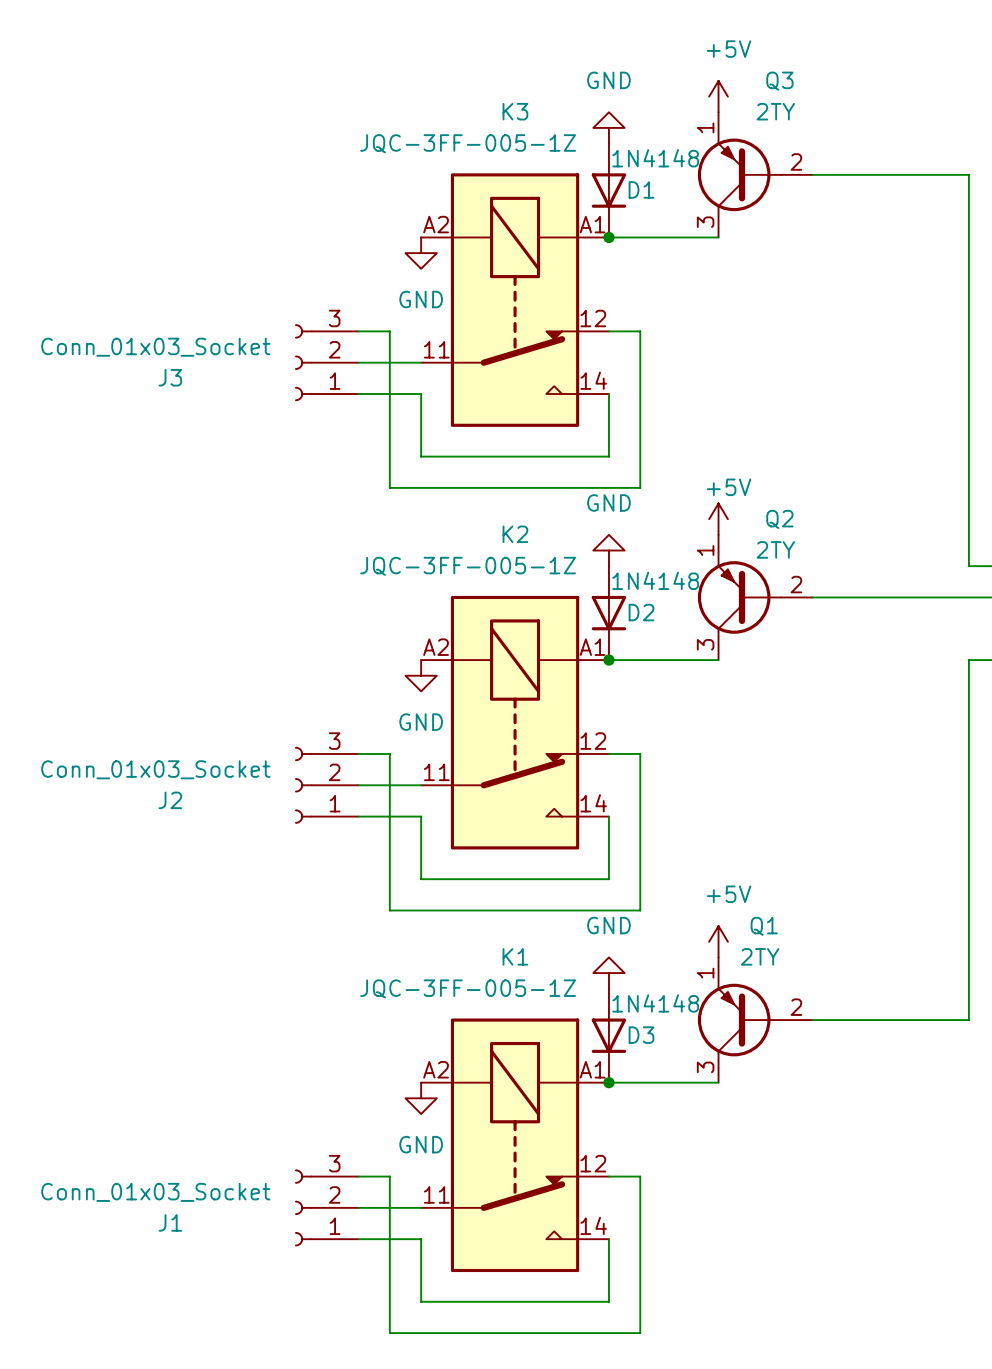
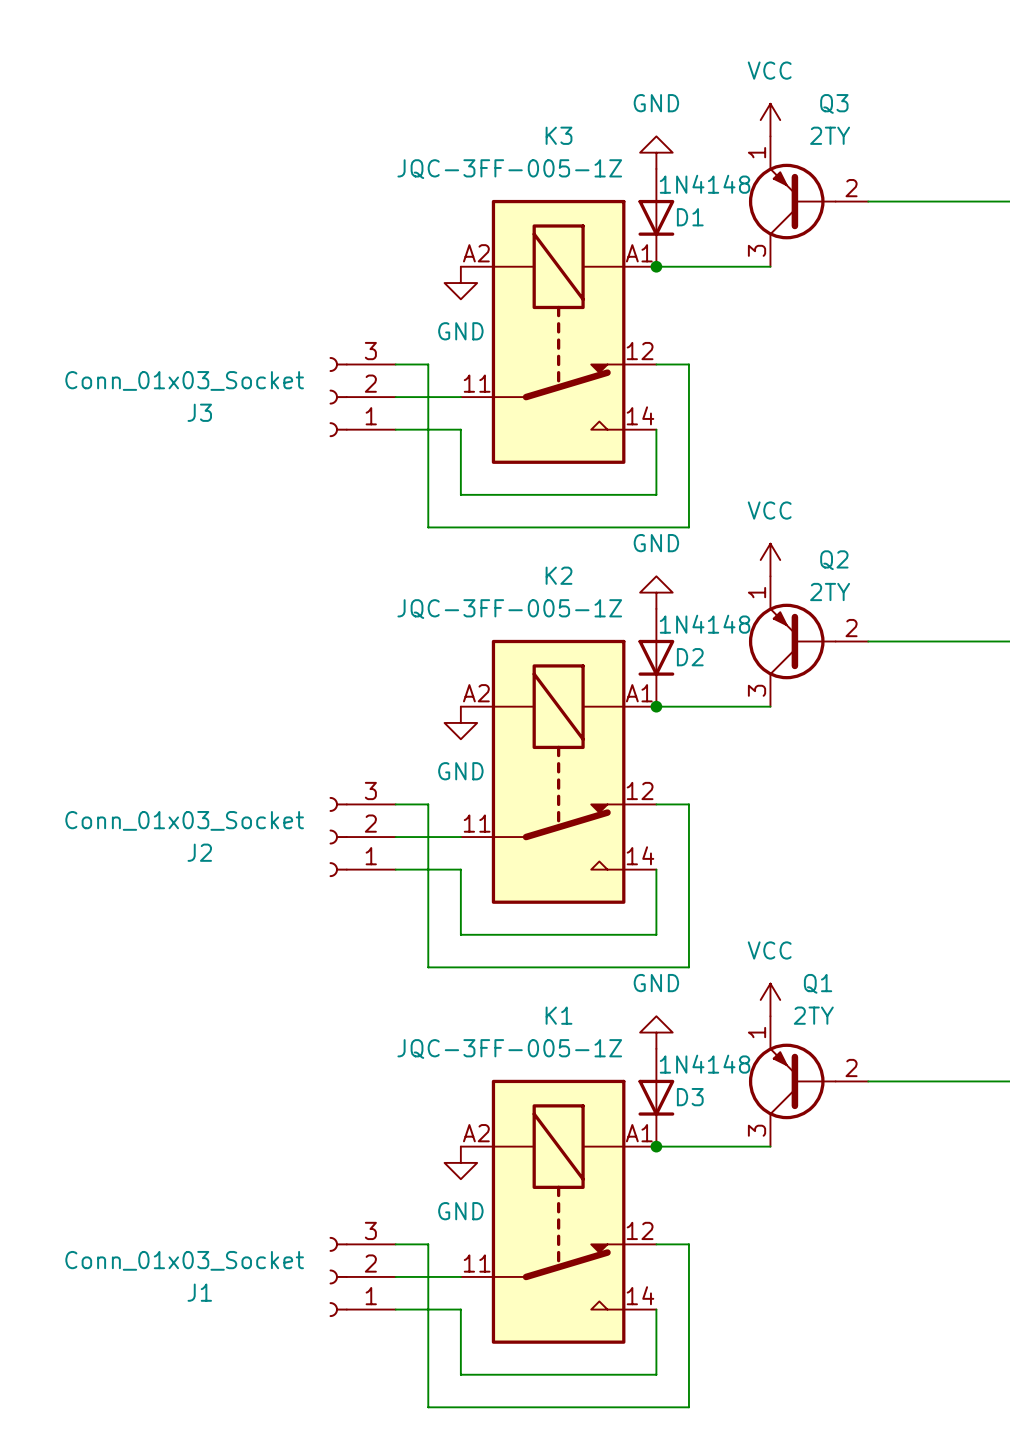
power symbol: +5V (718, 96) -> VCC (770, 120)
power symbol: +5V (718, 519) -> VCC (770, 560)
power symbol: +5V (718, 941) -> VCC (770, 999)

